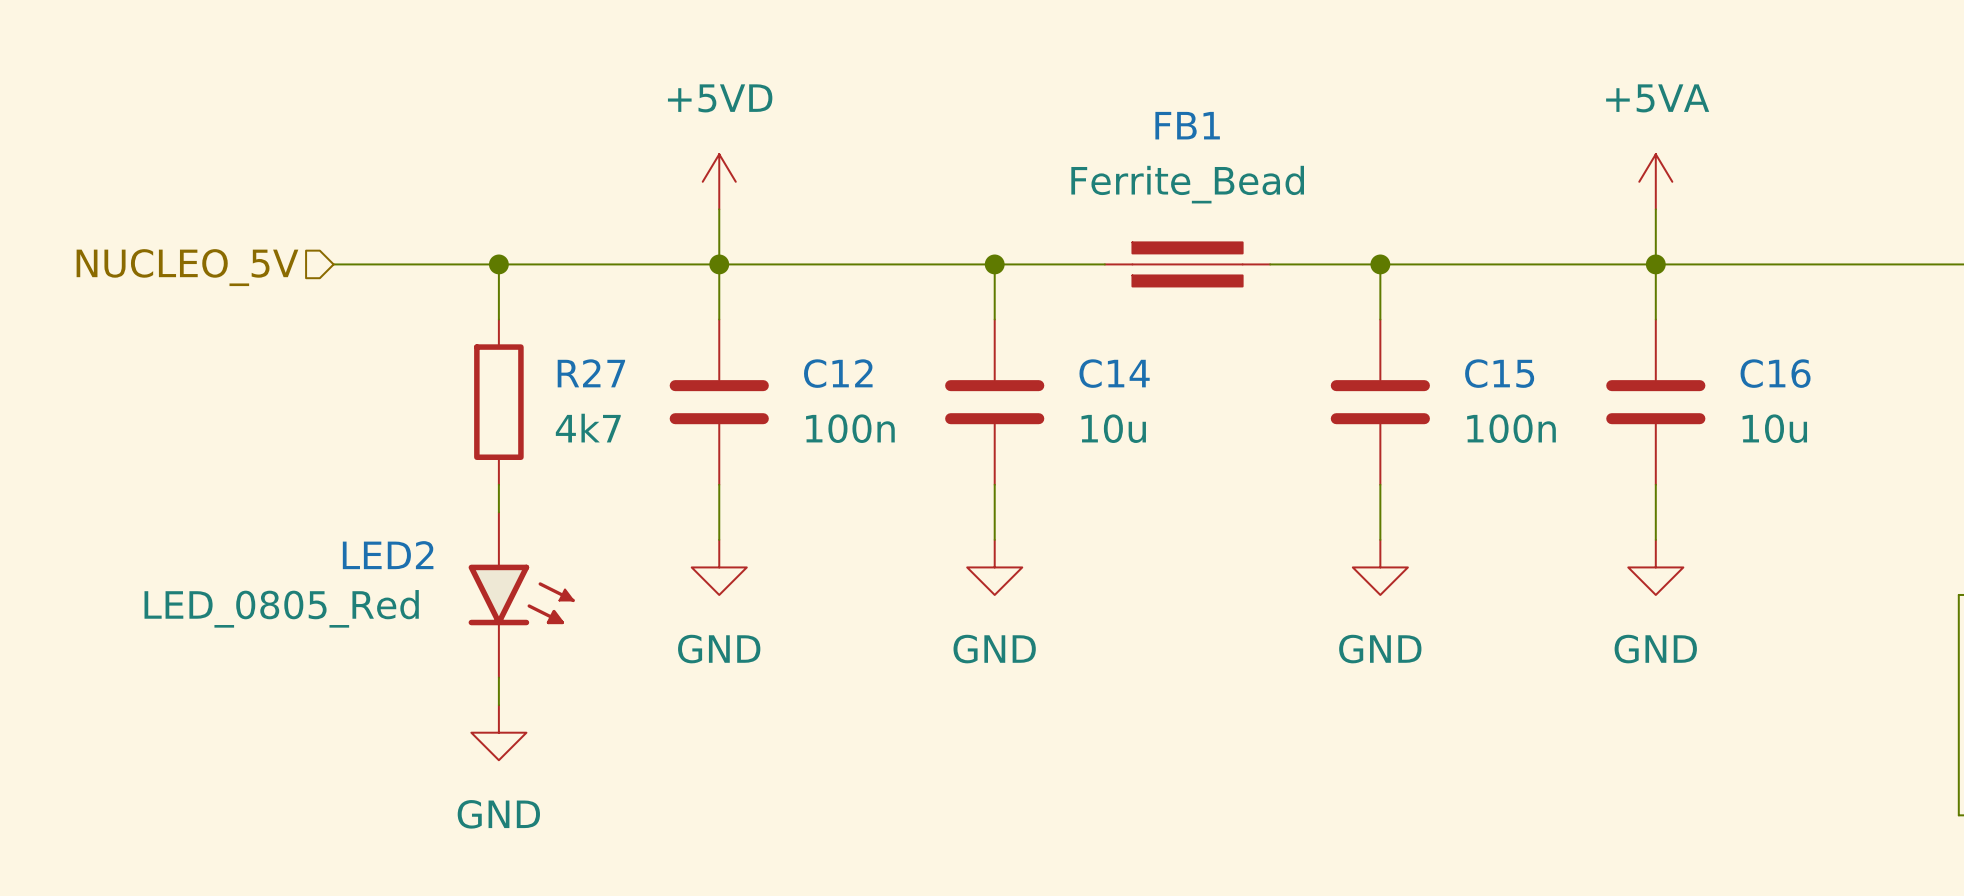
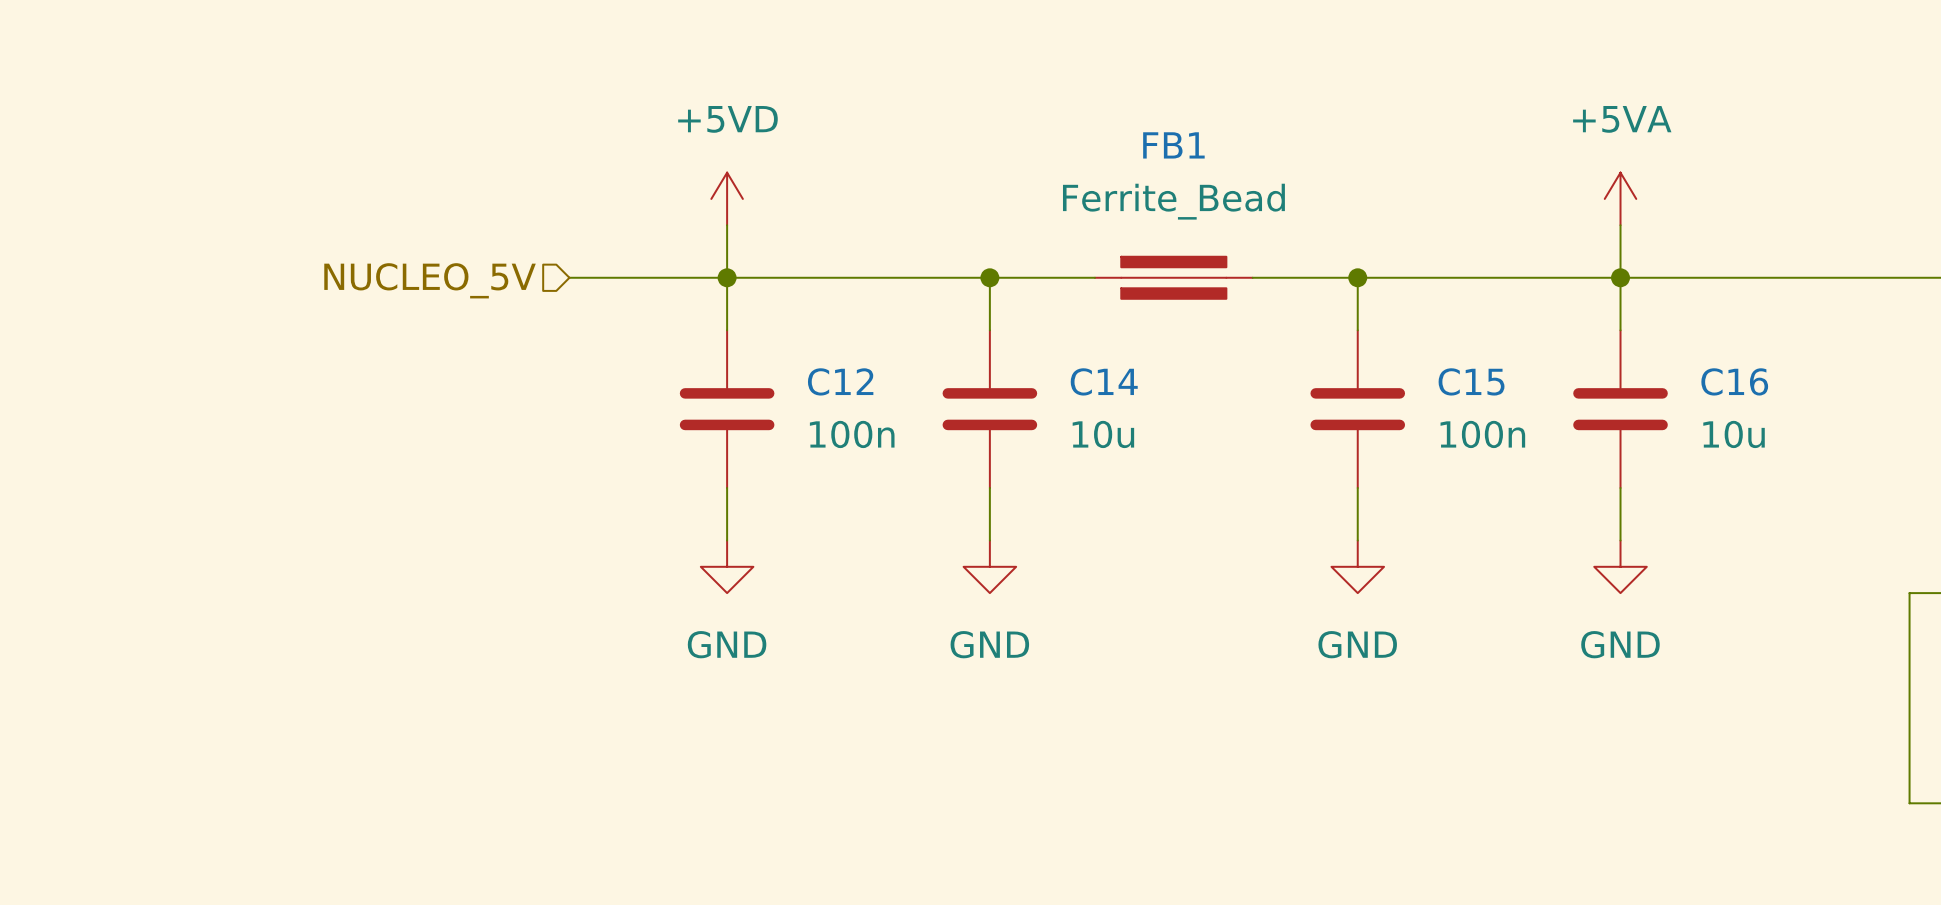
wire: (333, 264) (553, 264) -> none
wire: (498, 264) (498, 319) -> none
junction: (498, 264) -> none
hierarchical label position: NUCLEO_5V (187, 267) -> NUCLEO_5V (430, 280)
R27: 4k7 (498, 402) -> none
wire: (498, 484) (498, 512) -> none
LED2: LED_0805_Red (521, 594) -> none
wire: (498, 677) (498, 705) -> none
power symbol: GND (498, 732) -> none

